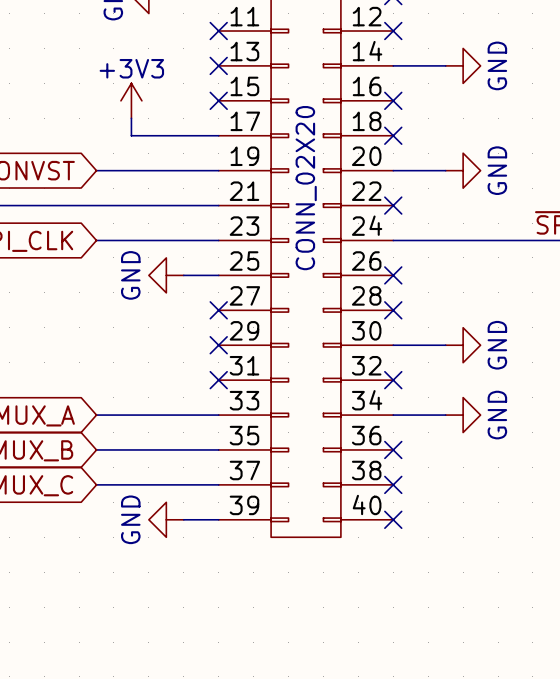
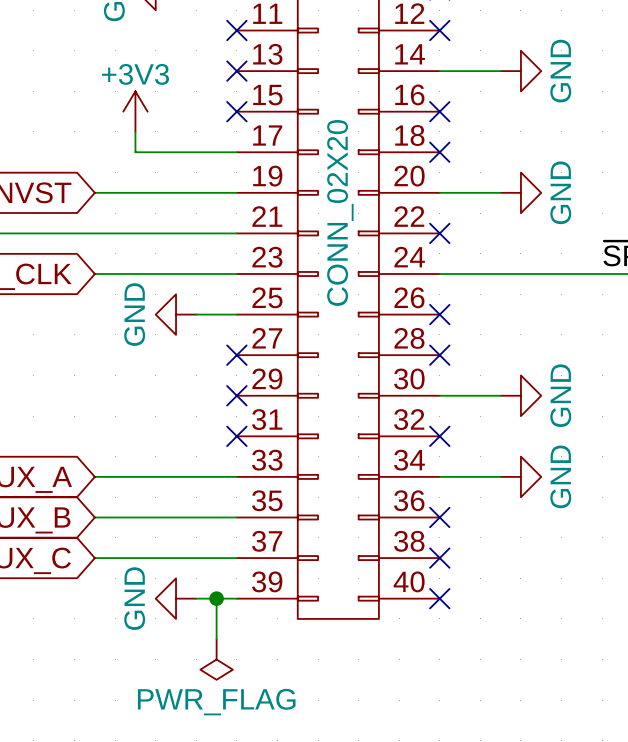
wire: none -> (216, 598) (216, 639)
junction: none -> (216, 598)
power symbol: none -> PWR_FLAG (216, 659)

